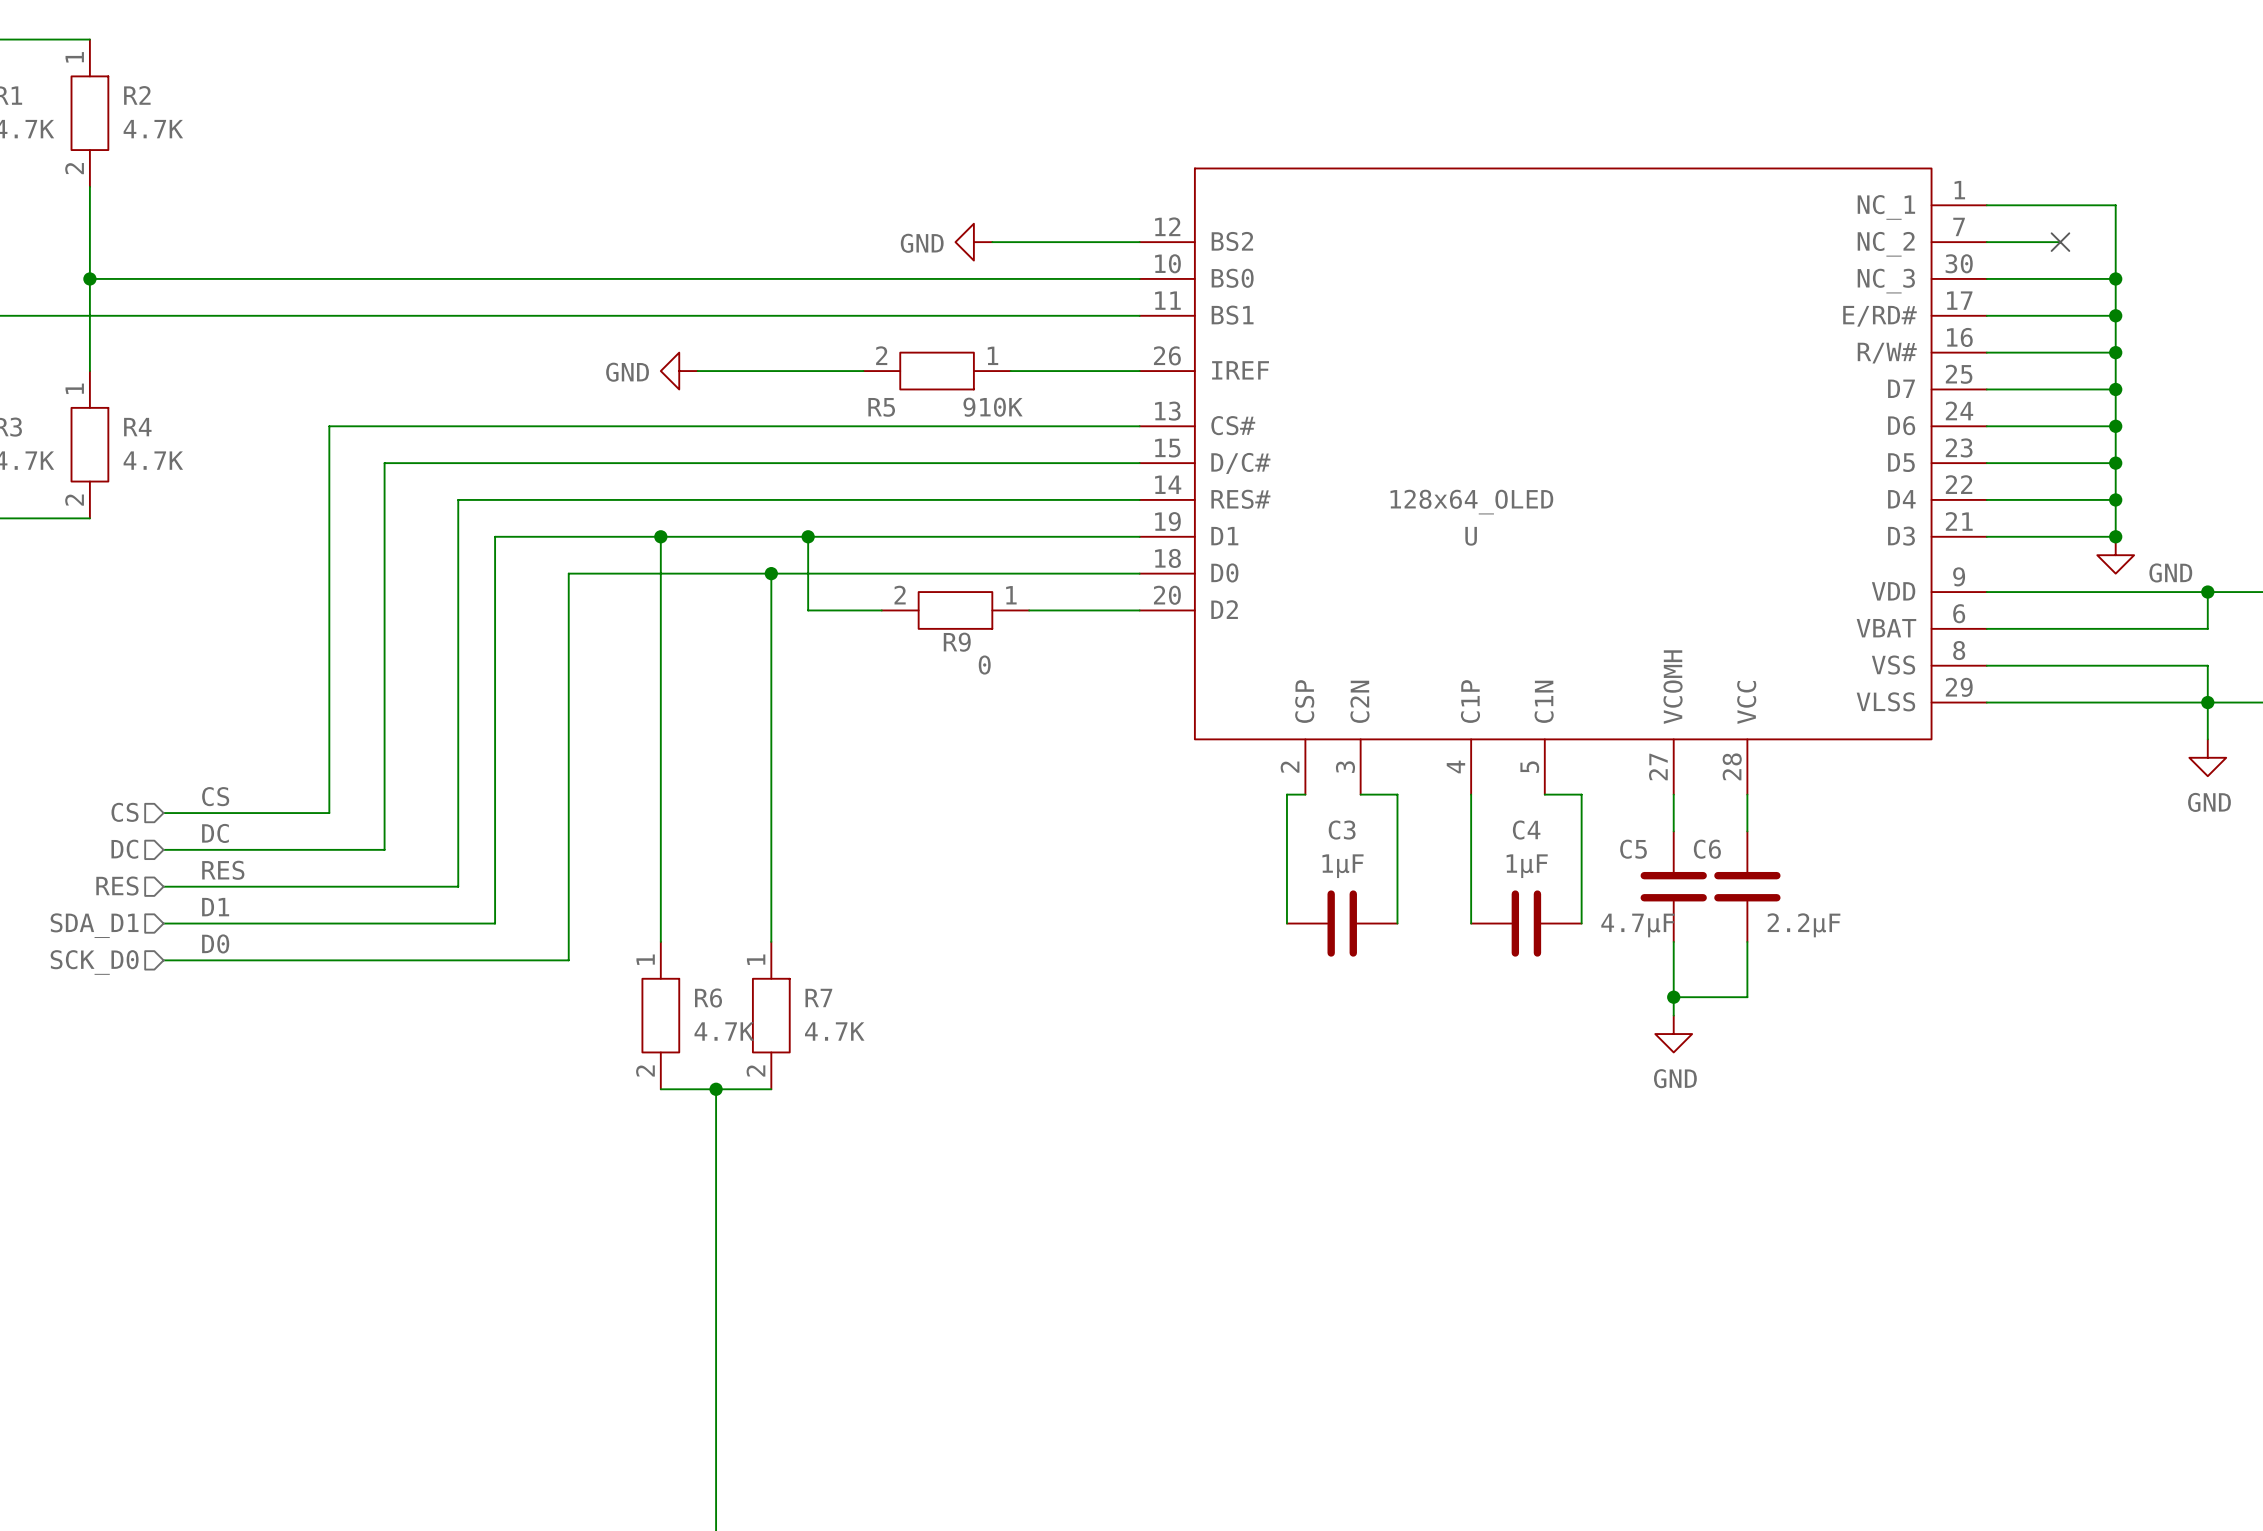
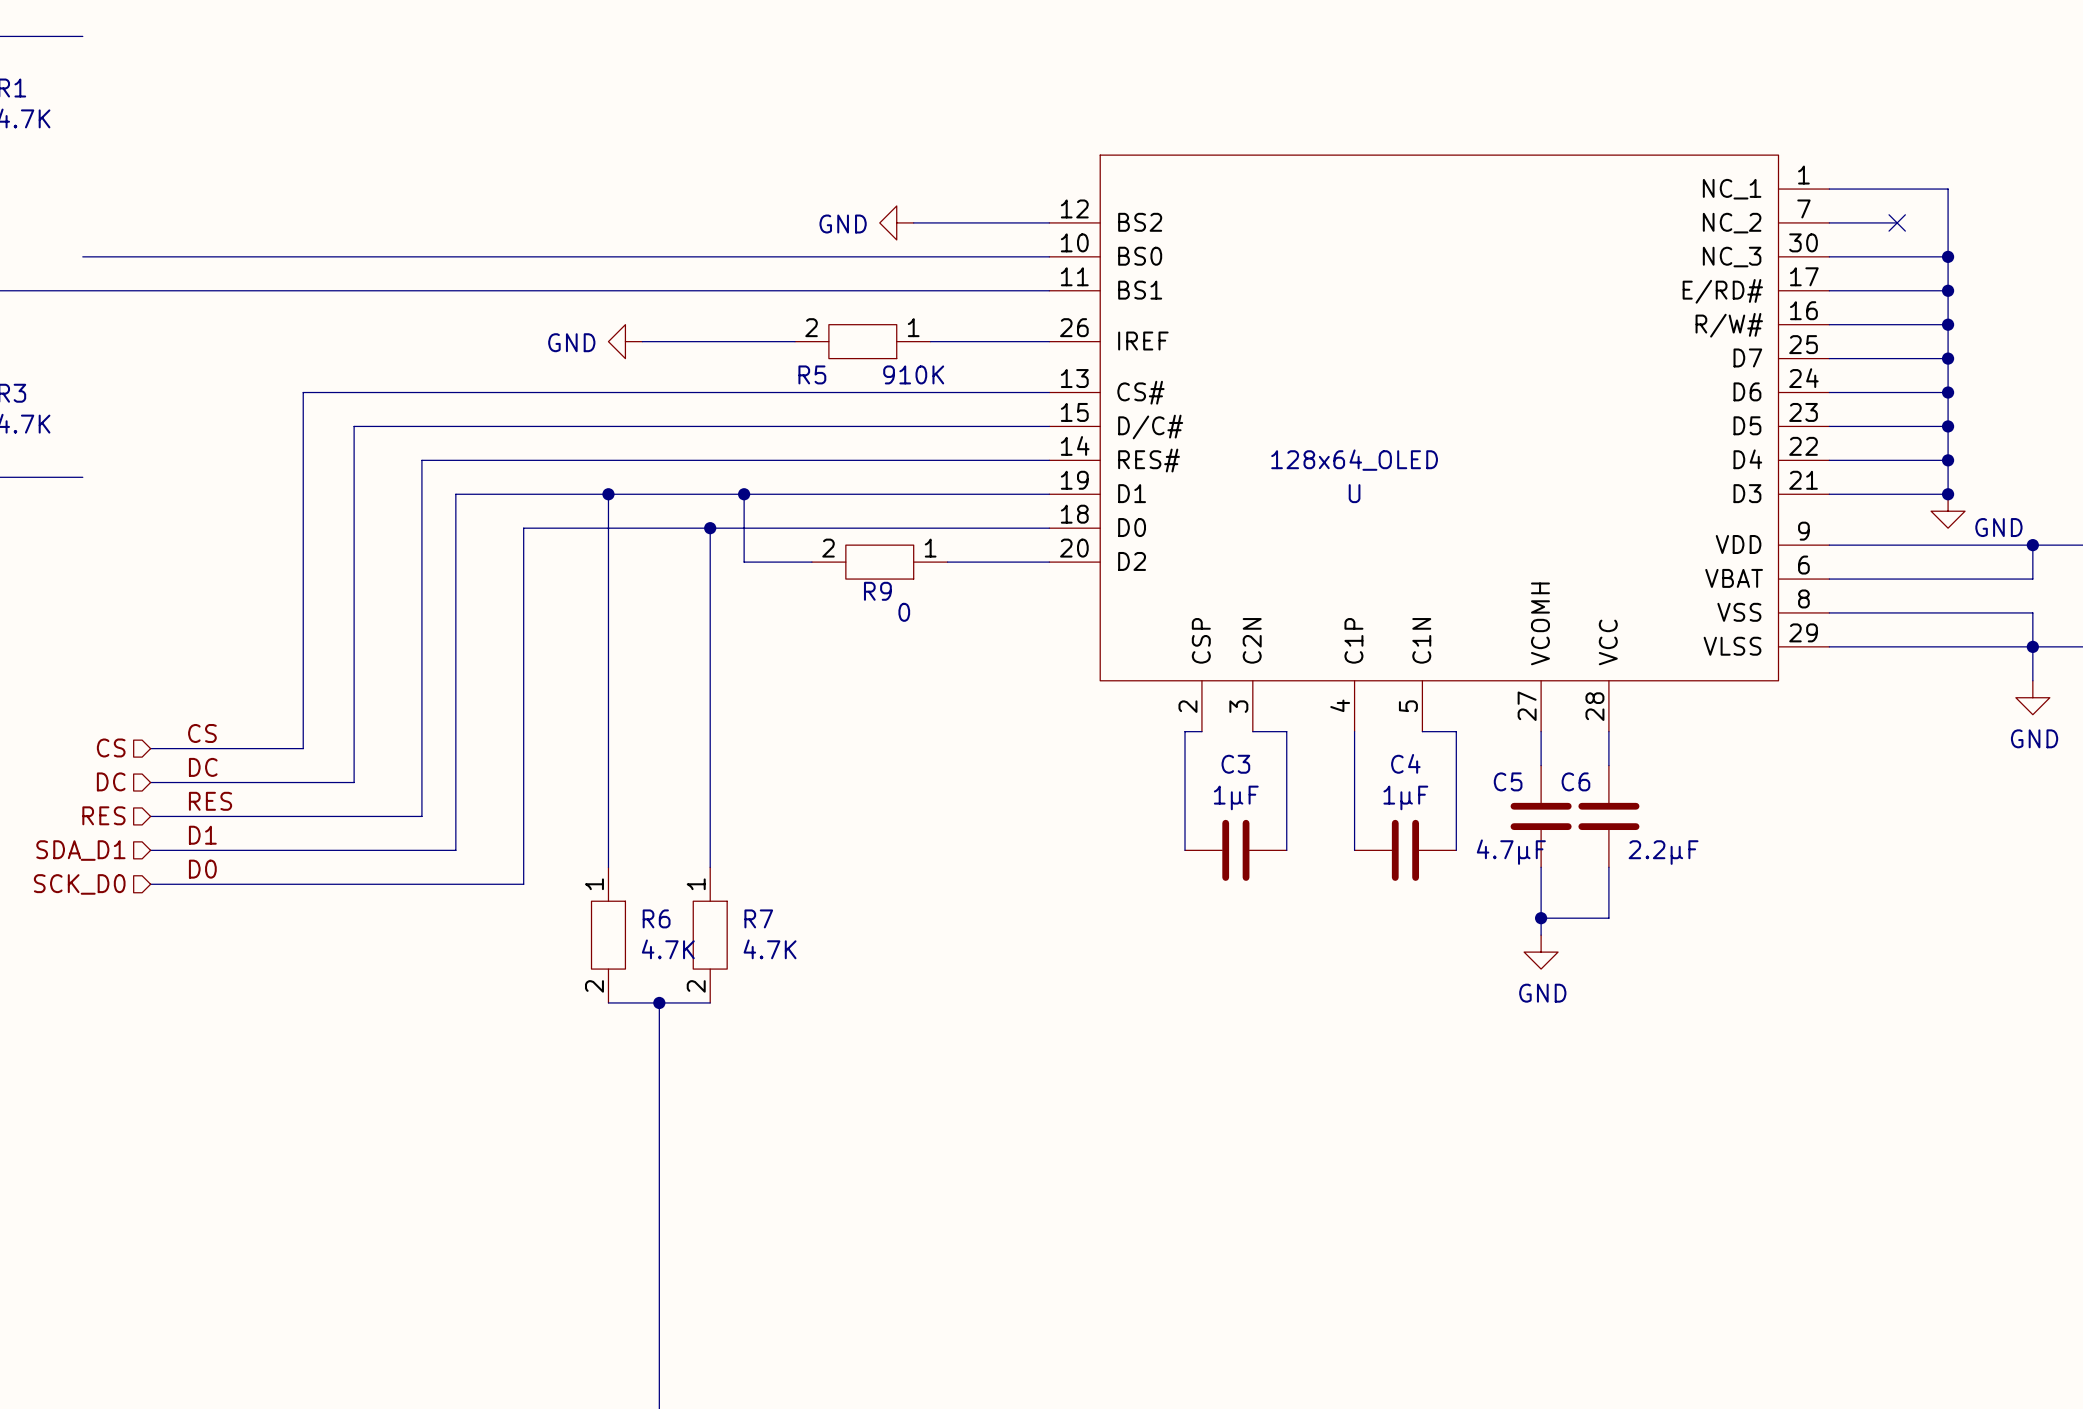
R2: 4.7K (89, 113) -> none
wire: (89, 186) (89, 371) -> none
junction: (89, 278) -> none
R4: 4.7K (89, 444) -> none

